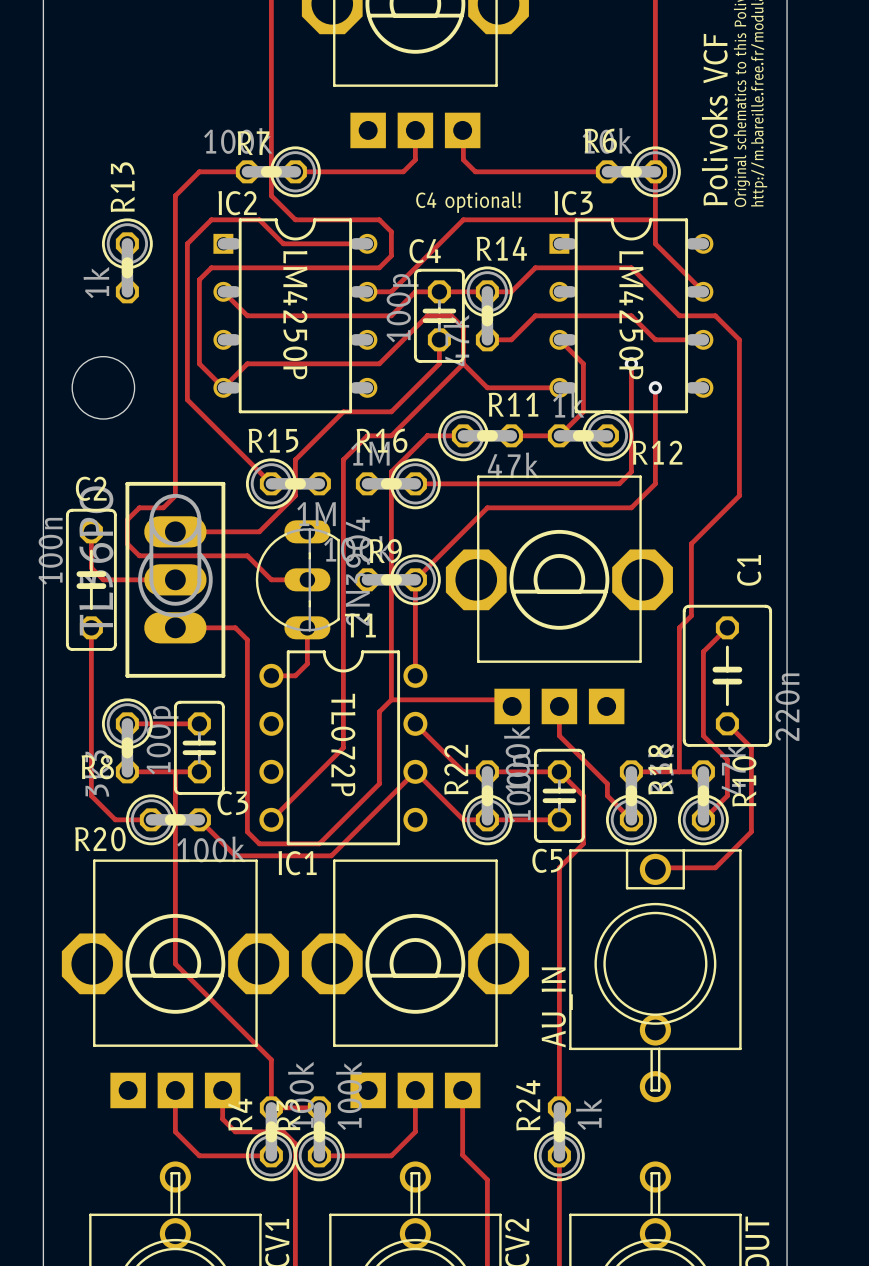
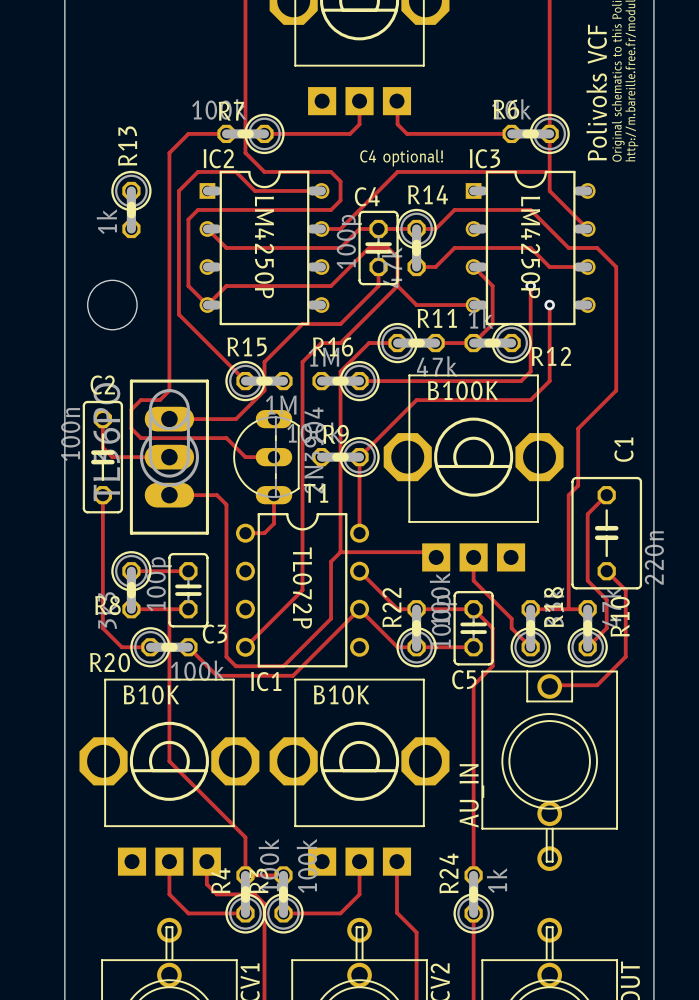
text: none -> B100K (462, 390)
text: none -> B10K (151, 694)
text: none -> B10K (341, 694)

